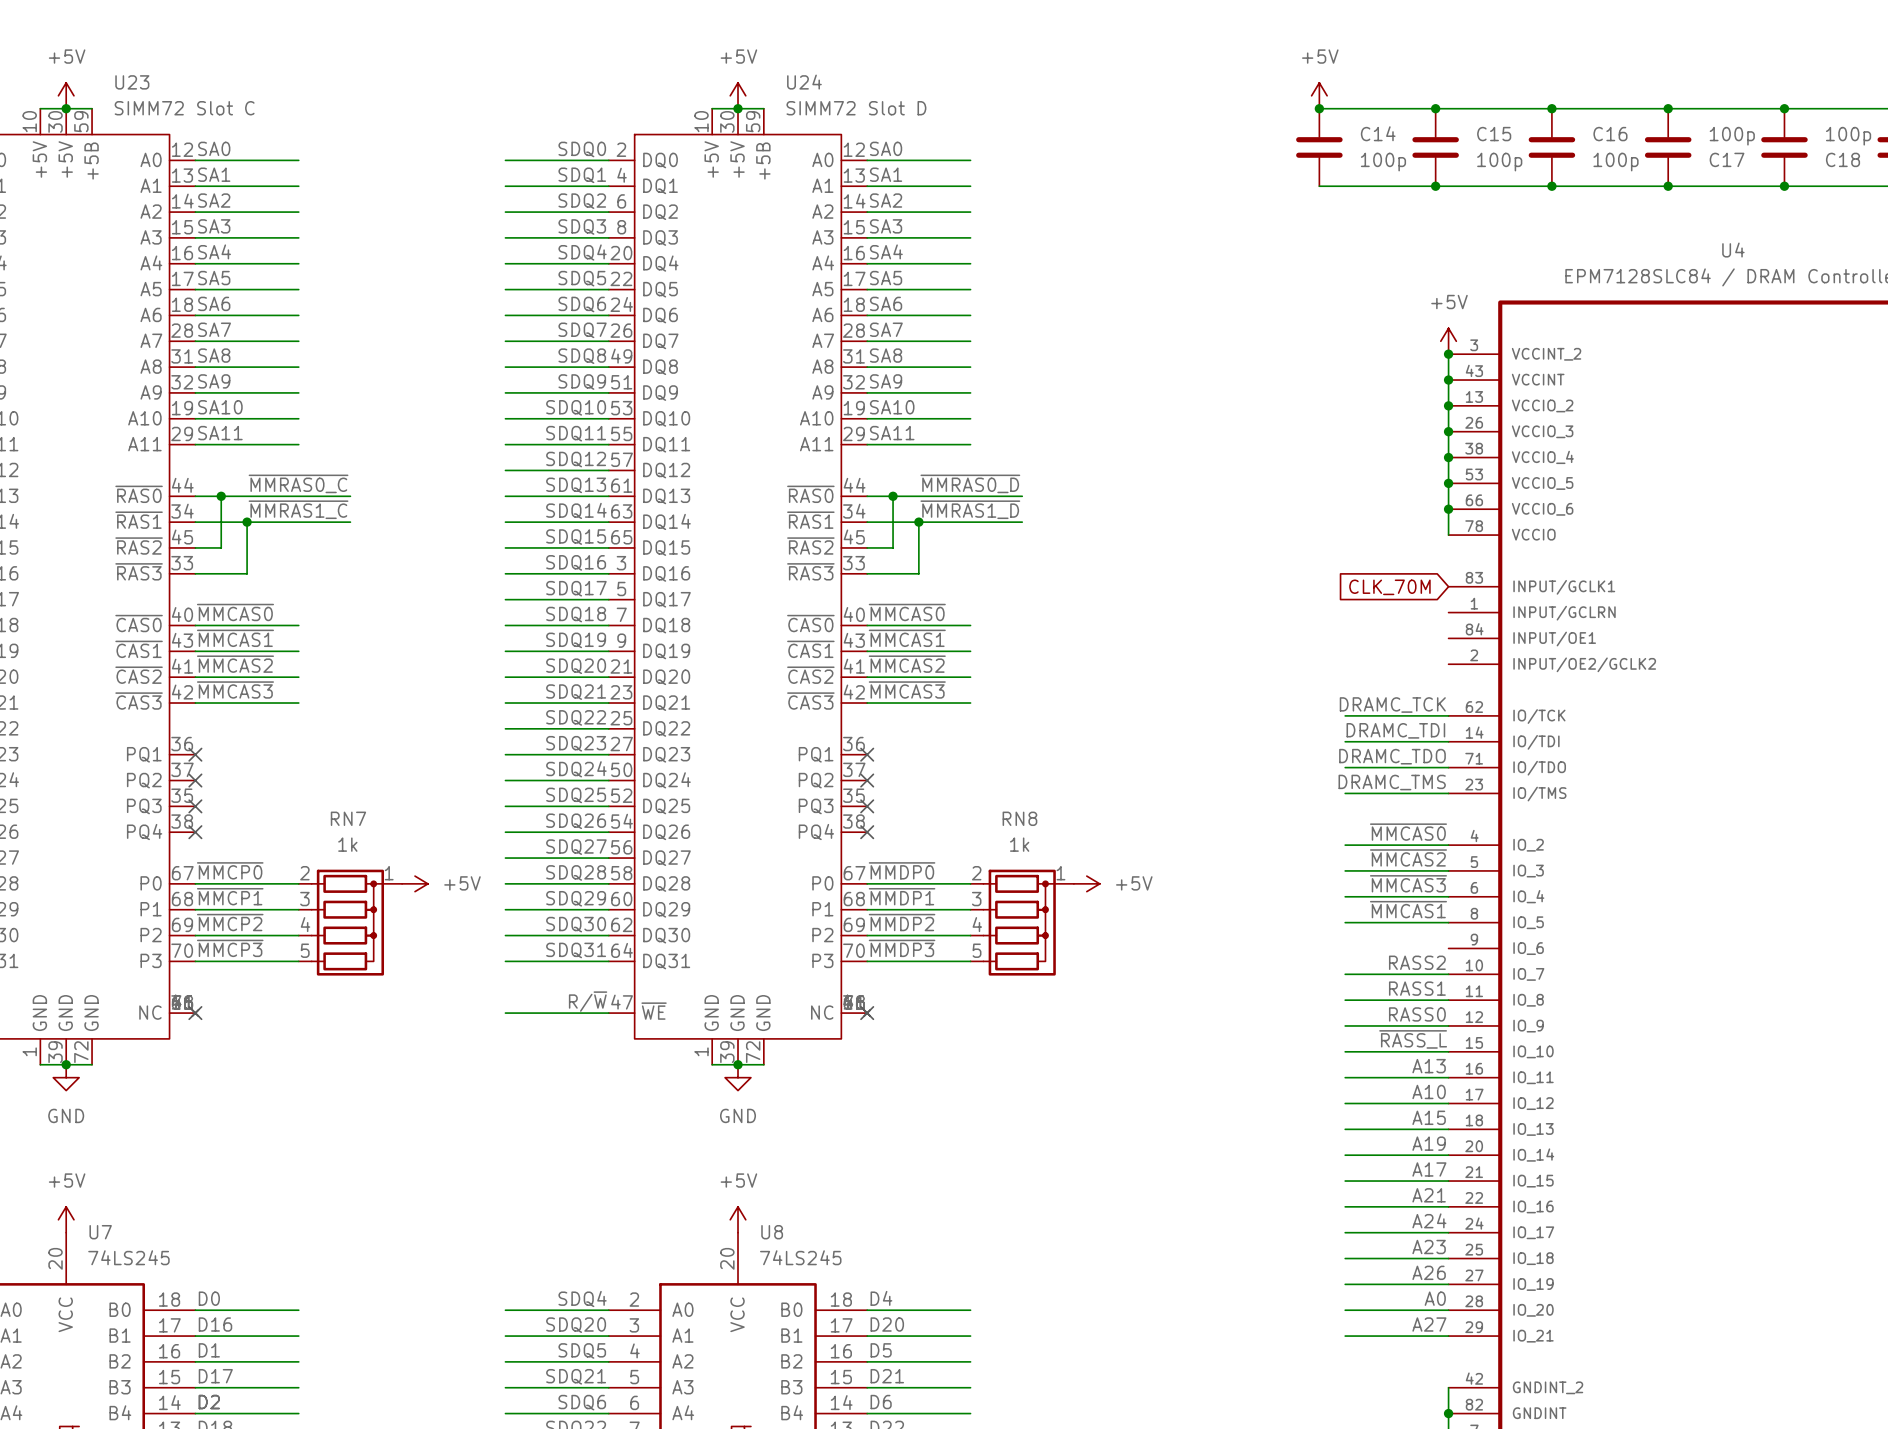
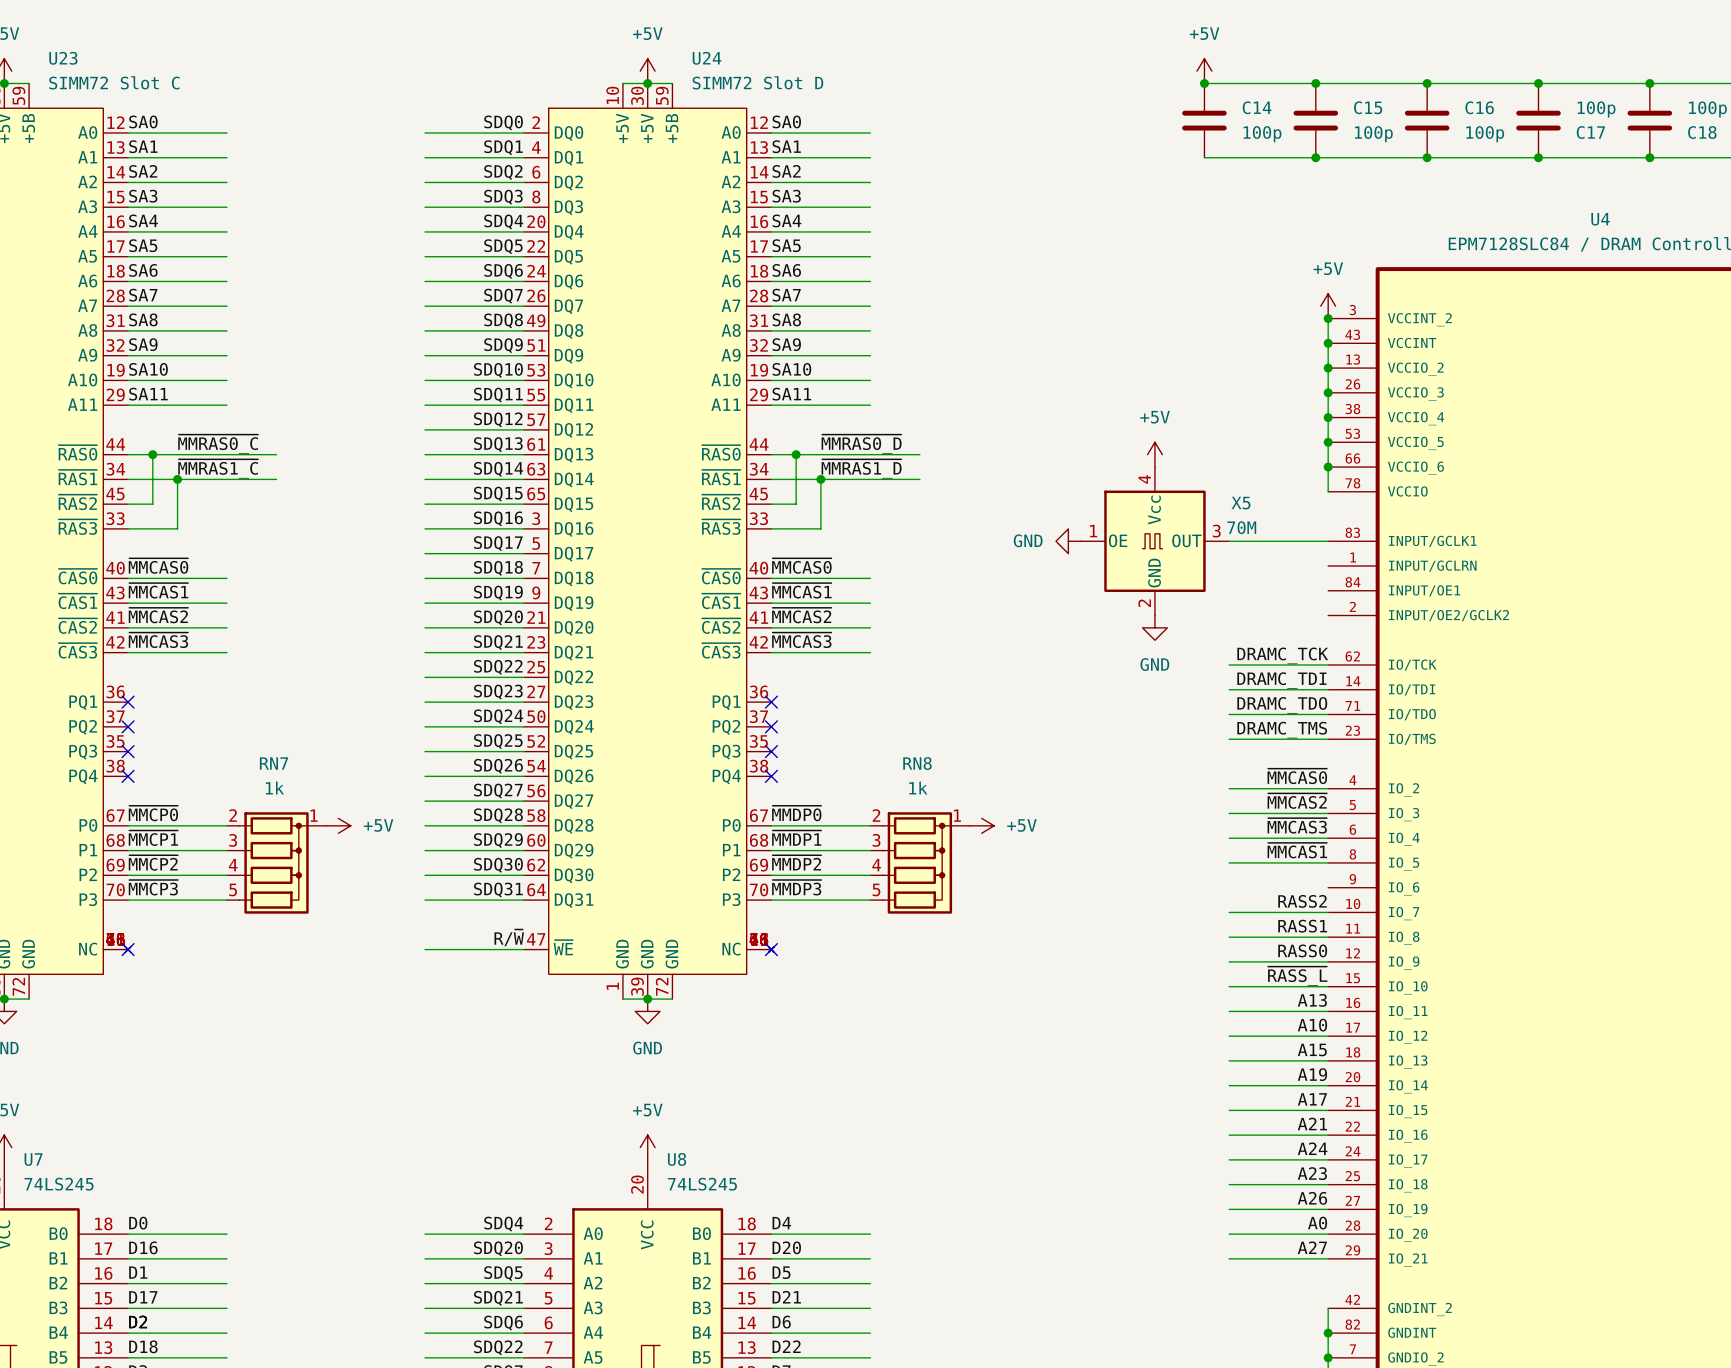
power symbol: none -> +5V (1154, 454)
power symbol: none -> GND (1068, 541)
X5: none -> 70M (1154, 541)
wire: none -> (1229, 541) (1328, 541)
global label: CLK_70M (1389, 587) -> none
power symbol: none -> GND (1154, 627)

